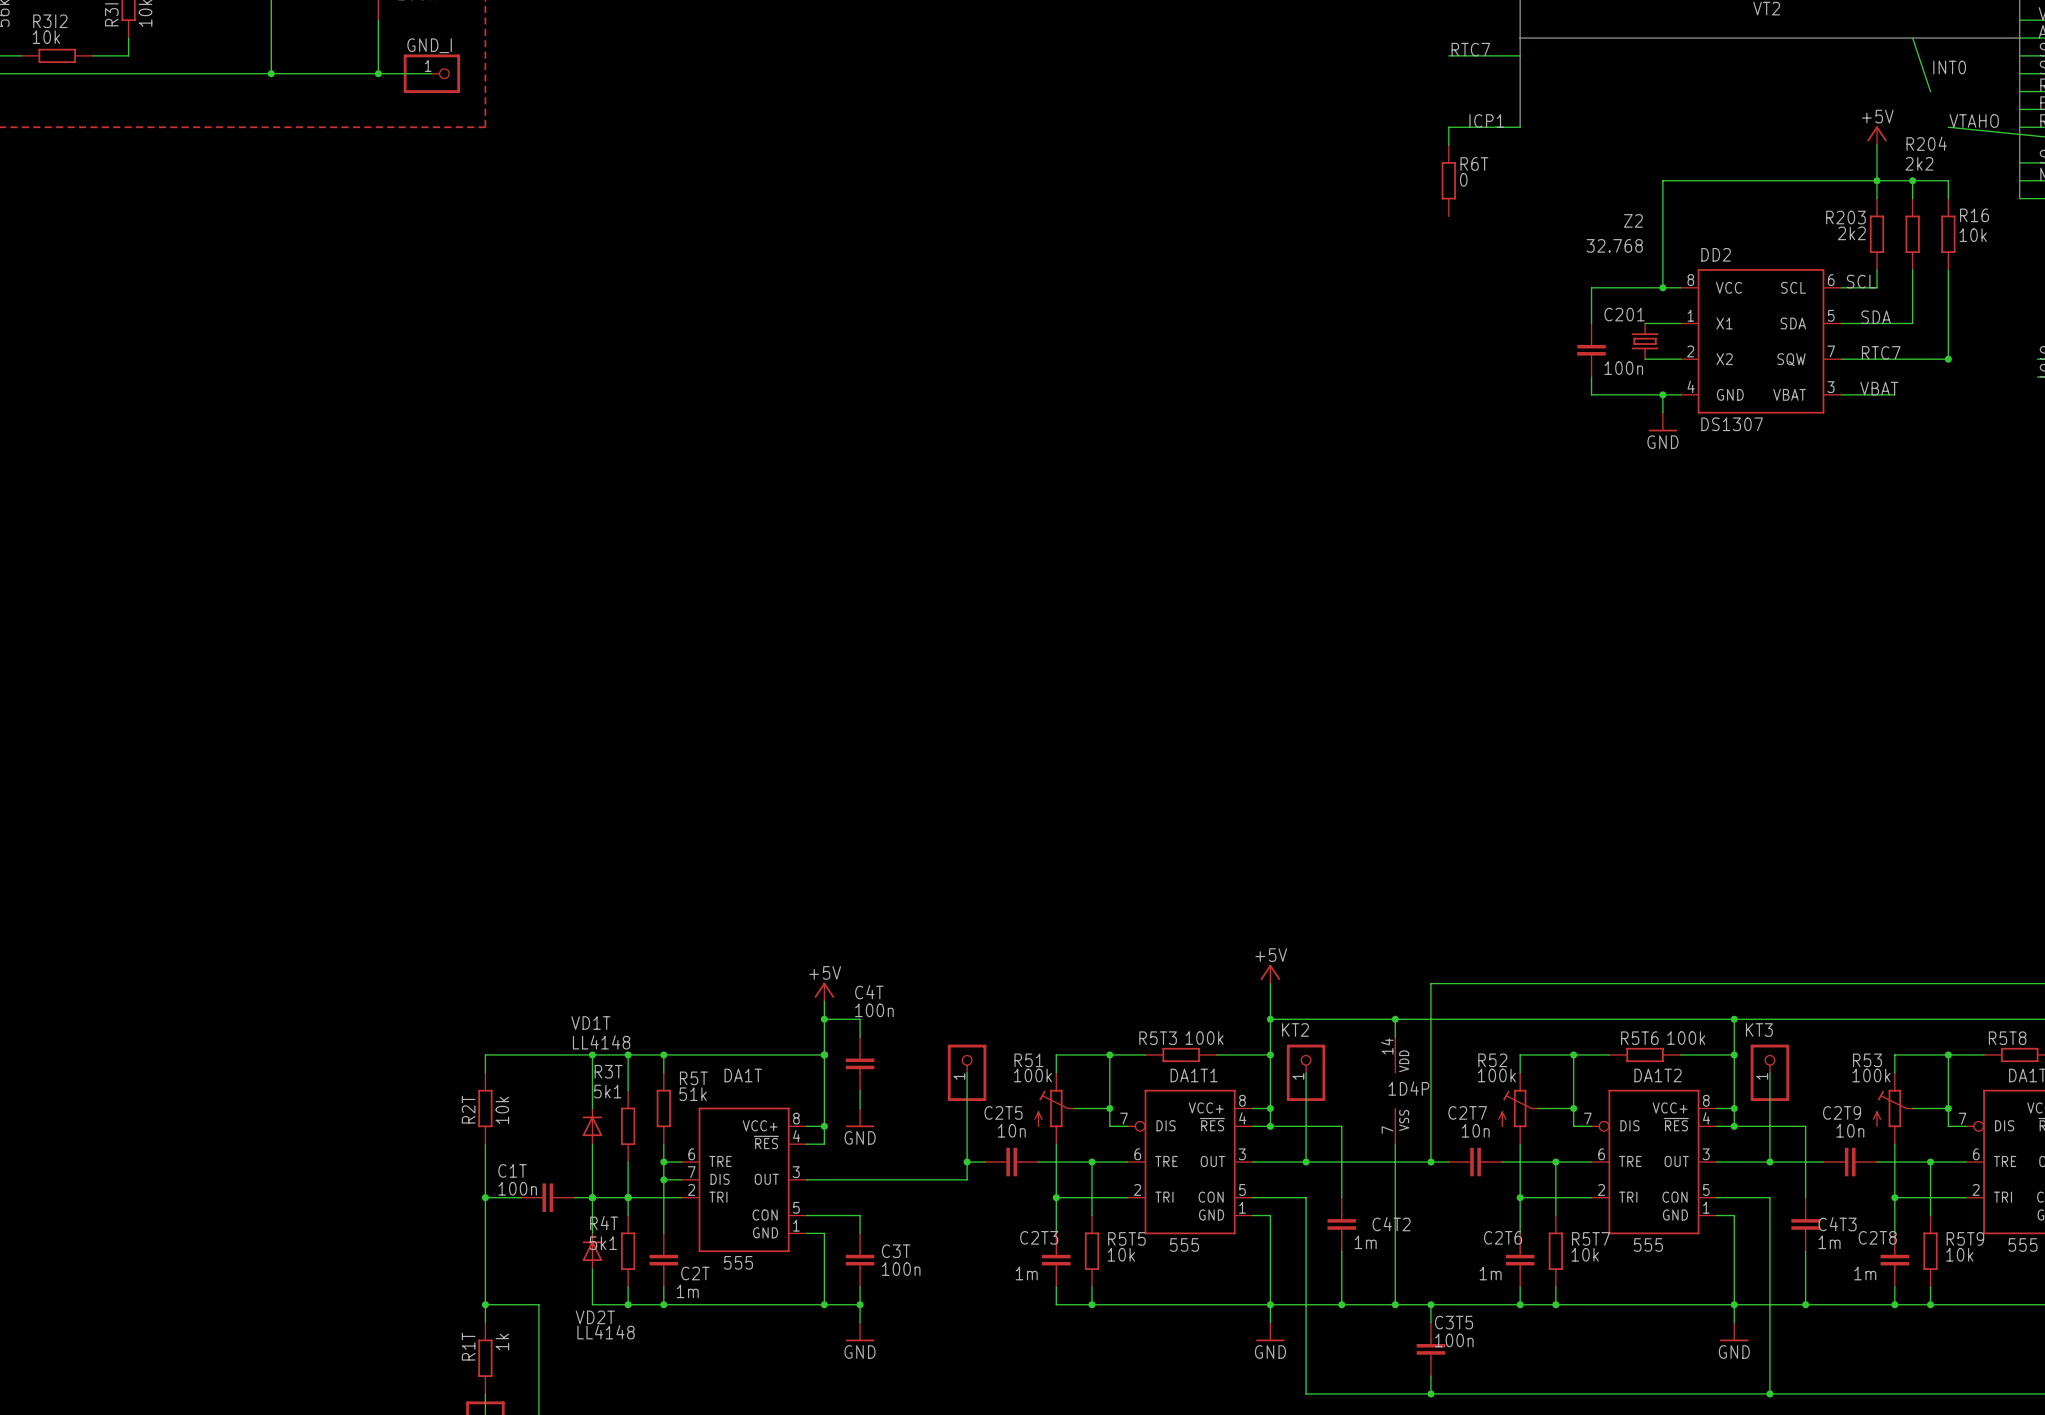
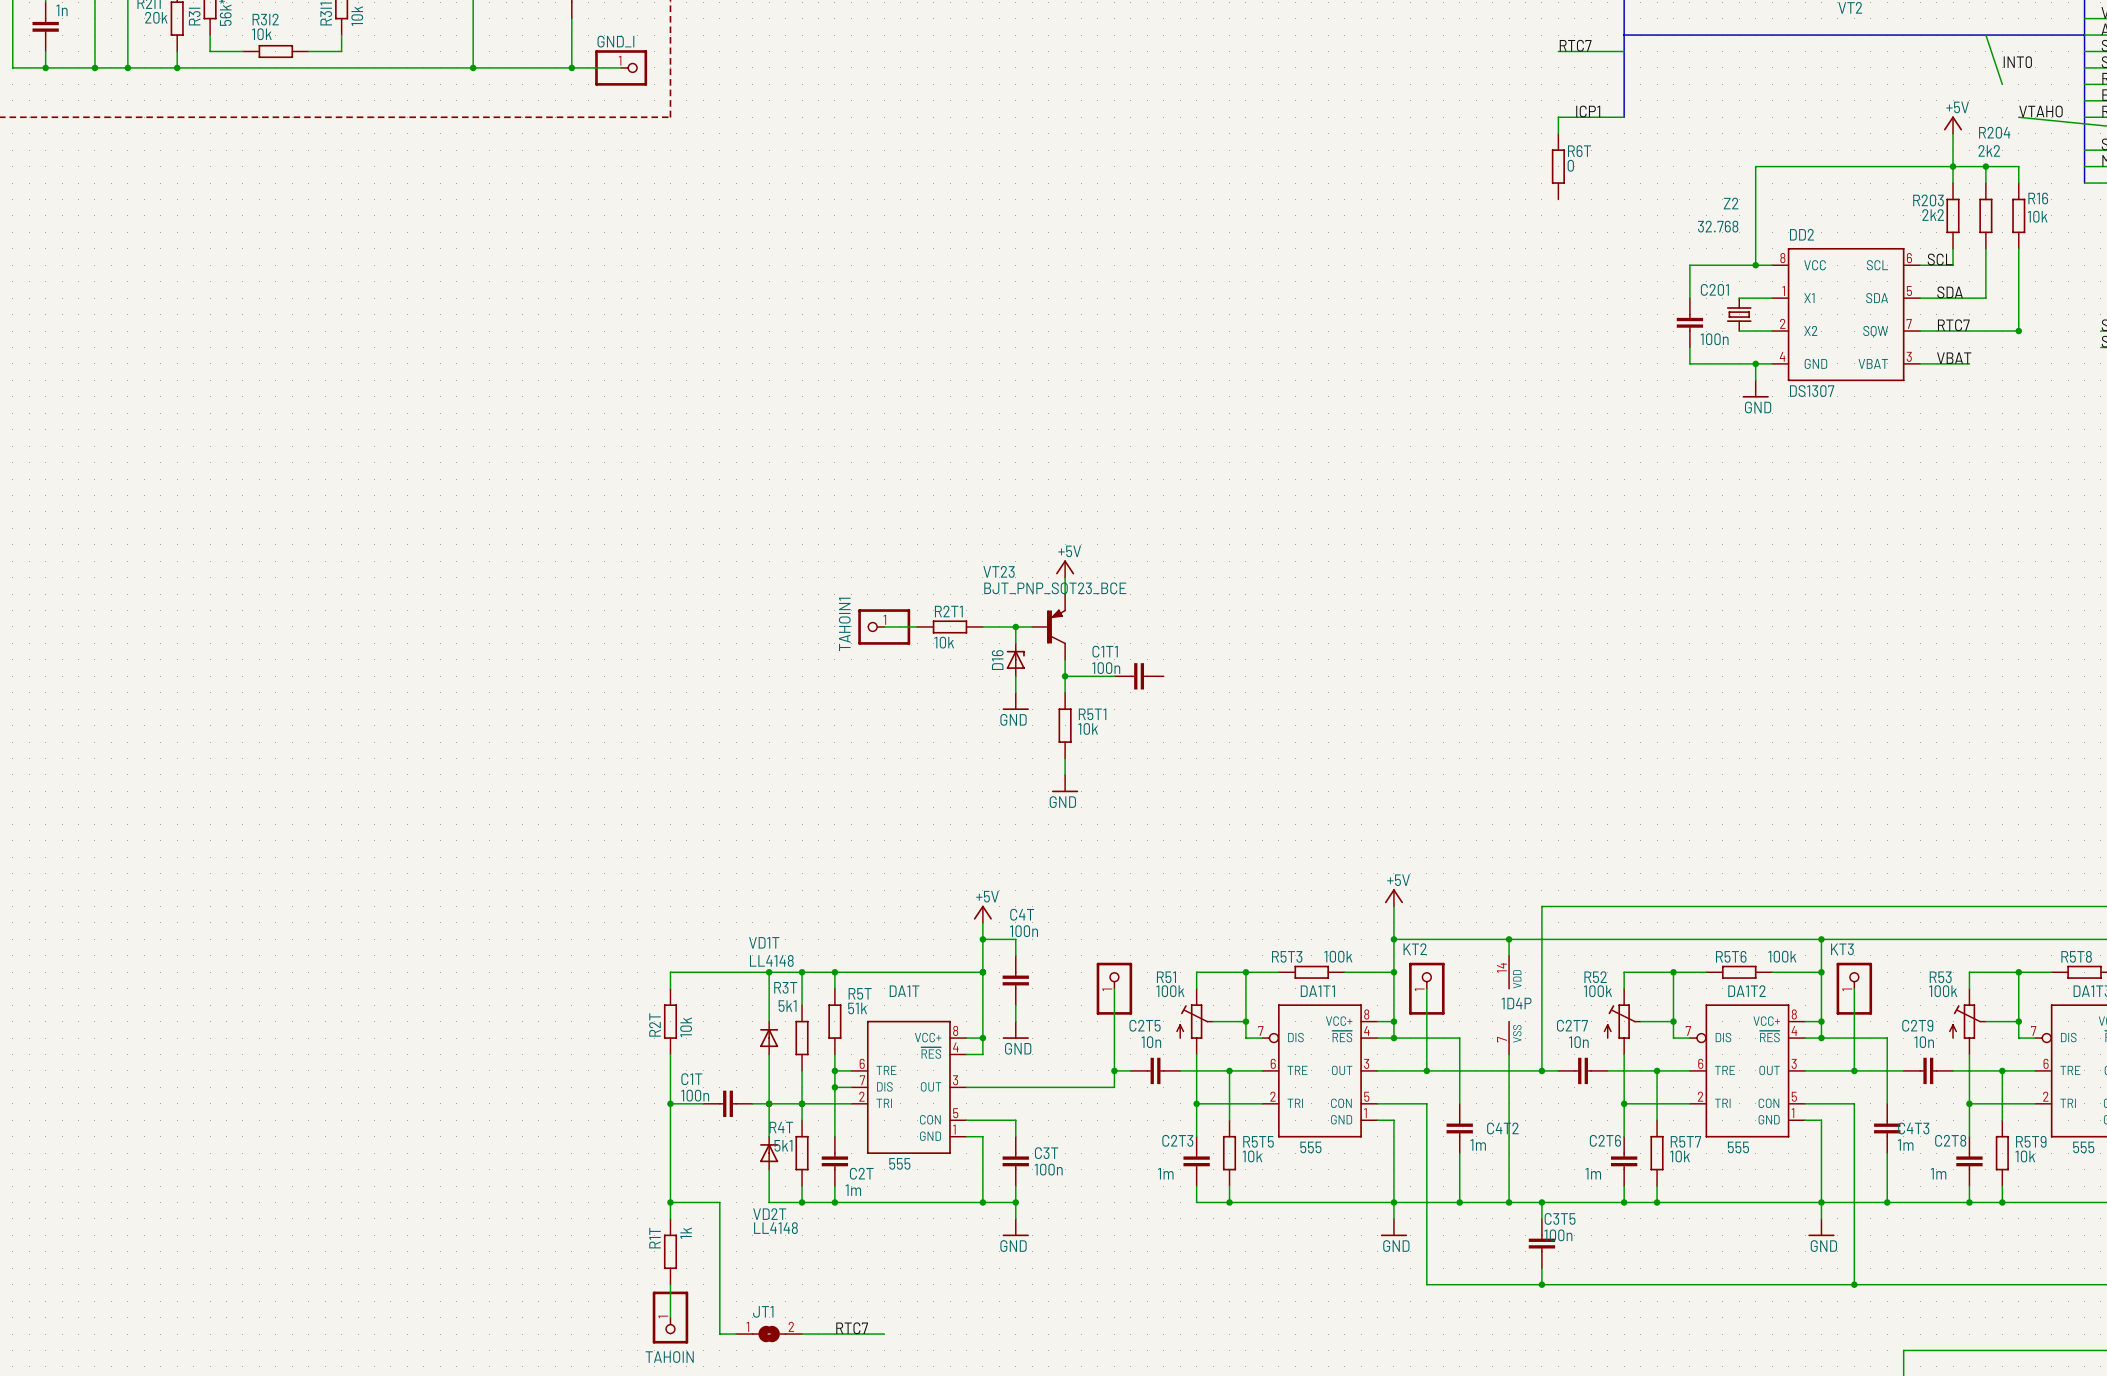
power symbol: none -> +5V (1065, 569)
wire: none -> (1065, 577) (1065, 594)
wire: none -> (884, 626) (917, 626)
TAHOIN1: none -> (884, 626)
R2T1: none -> 10k (950, 626)
wire: none -> (982, 626) (1032, 626)
wire: none -> (1015, 626) (1015, 643)
junction: none -> (1015, 626)
VT23: none -> BJT_PNP_SOT23_BCE (1048, 626)
D16: none -> (1015, 659)
wire: none -> (1065, 659) (1065, 692)
wire: none -> (1015, 676) (1015, 692)
wire: none -> (1065, 676) (1114, 676)
junction: none -> (1065, 676)
C1T1: none -> 100n (1139, 676)
power symbol: none -> GND (1015, 701)
R5T1: none -> 10k (1065, 725)
wire: none -> (1065, 758) (1065, 774)
power symbol: none -> GND (1065, 783)

